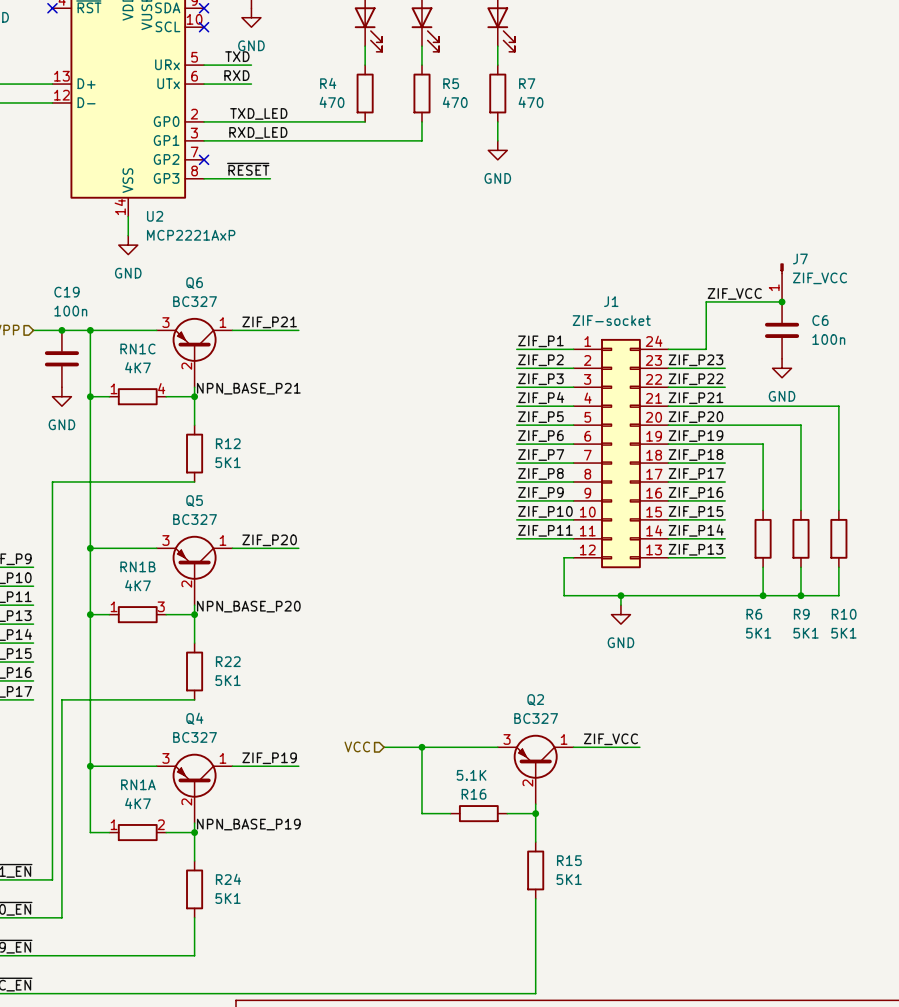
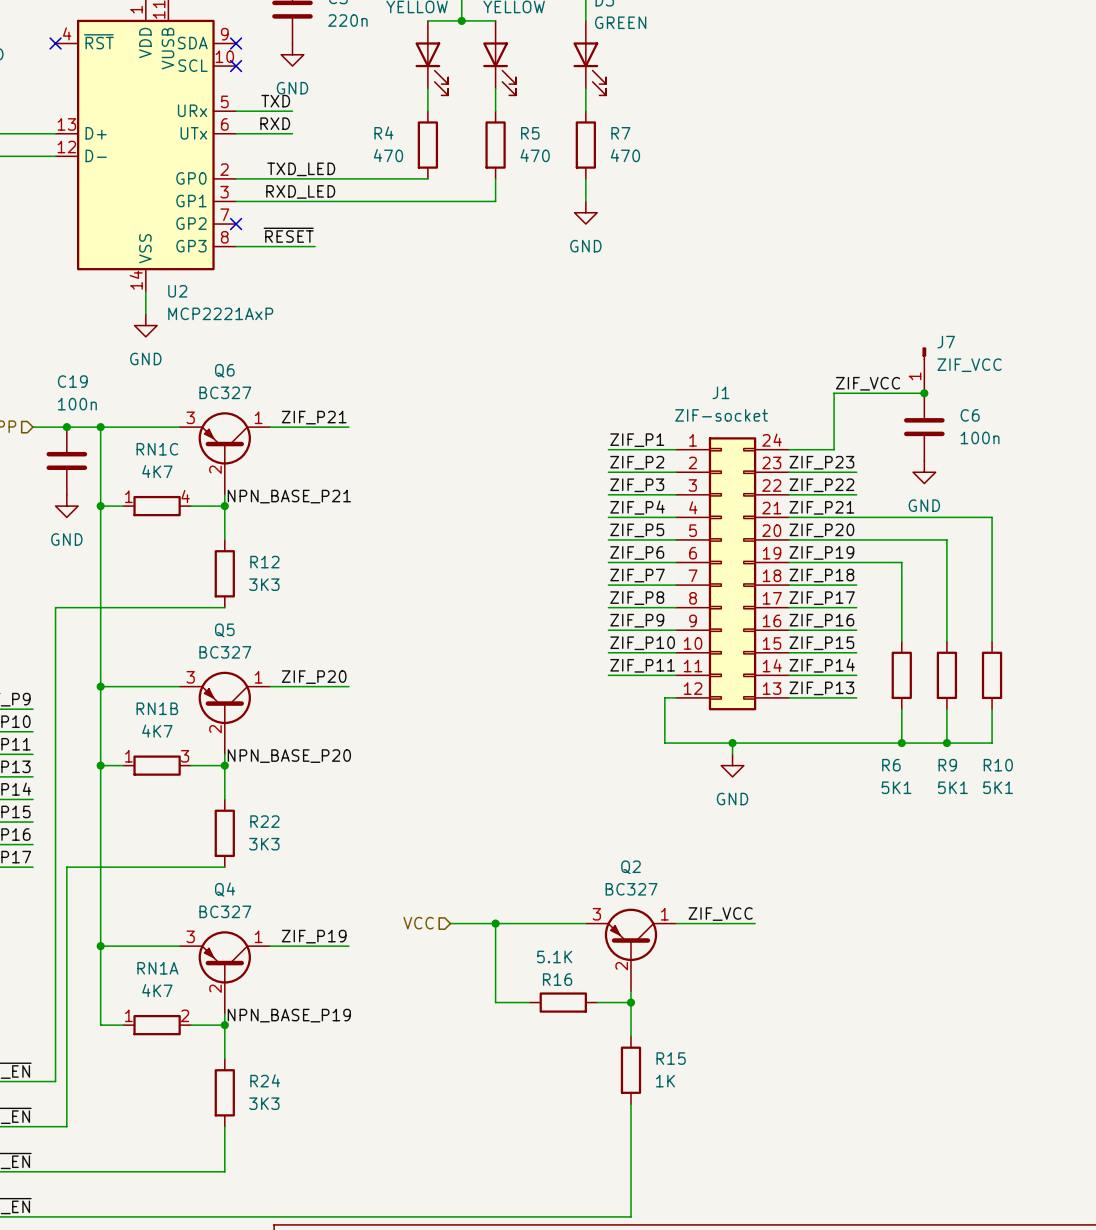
R12 value: 5K1 (228, 462) -> 3K3 (264, 584)
R22 value: 5K1 (228, 680) -> 3K3 (264, 844)
R15 value: 5K1 (569, 879) -> 1K (665, 1081)
R24 value: 5K1 (228, 898) -> 3K3 (264, 1103)

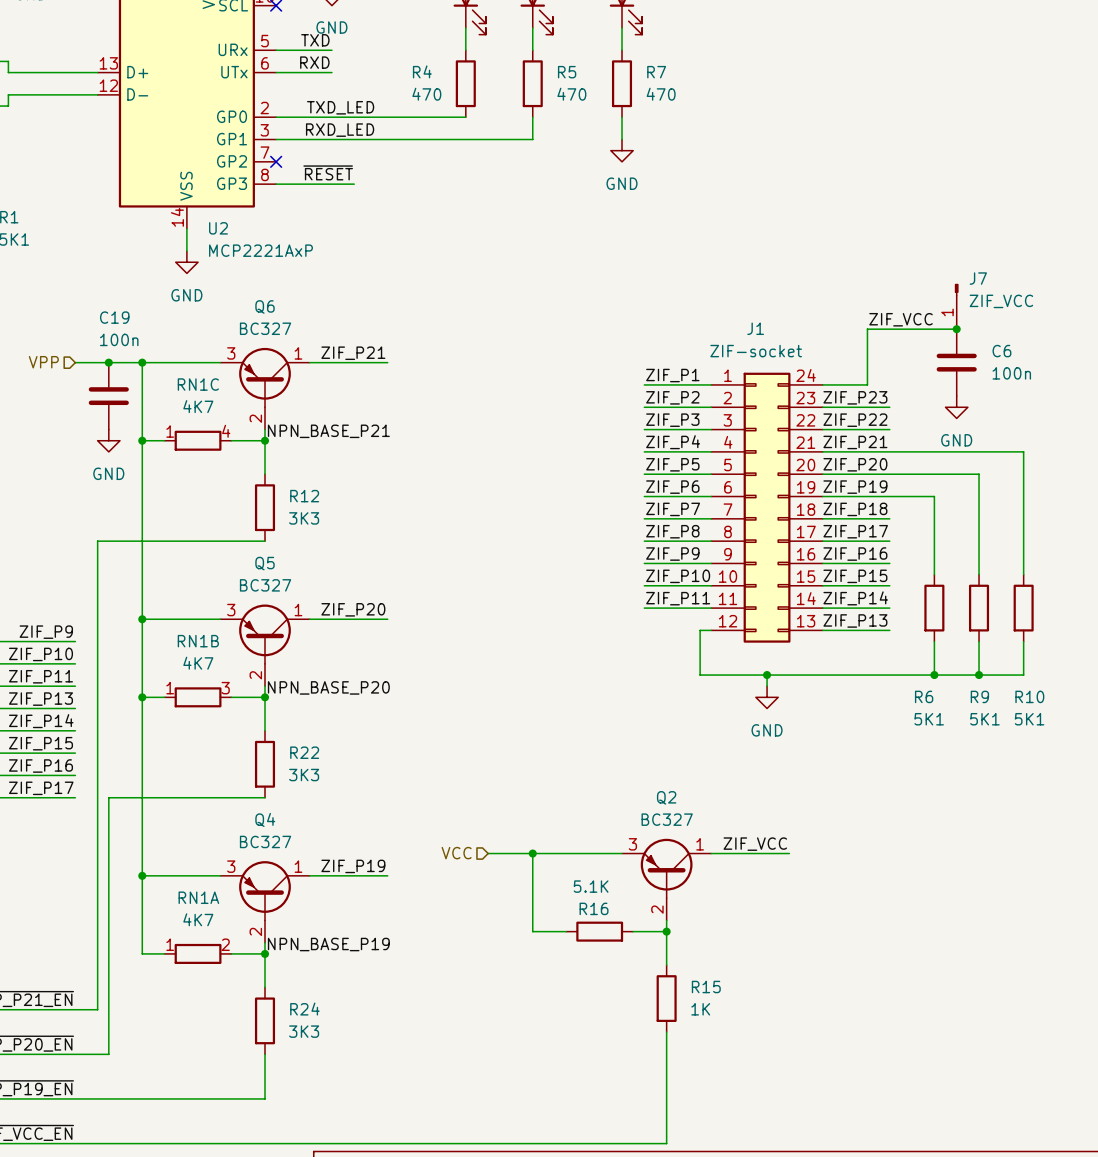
Q6 symbol: [179, 412, 270, 495] -> [220, 347, 310, 430]
Q5 symbol: [179, 671, 270, 755] -> [220, 604, 310, 687]
Q2 symbol: [585, 908, 677, 992] -> [622, 838, 712, 921]
Q4 symbol: [179, 931, 270, 1014] -> [220, 861, 310, 943]

